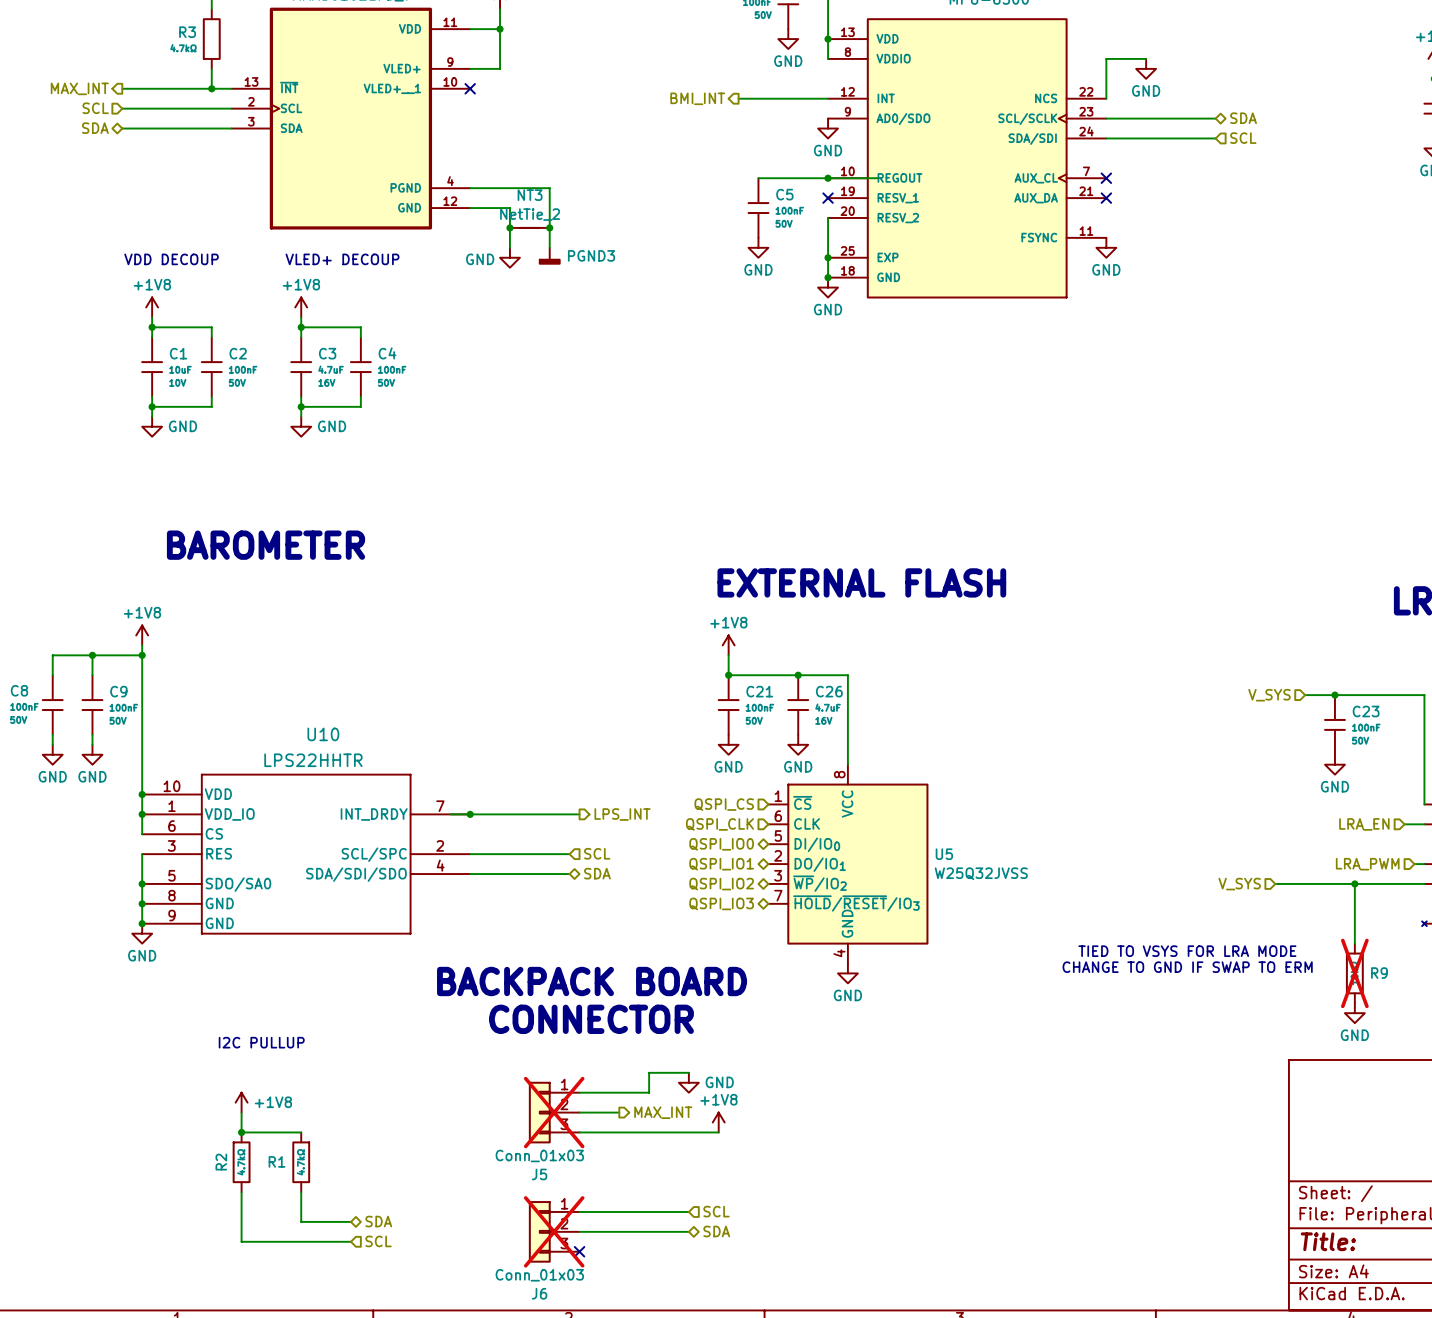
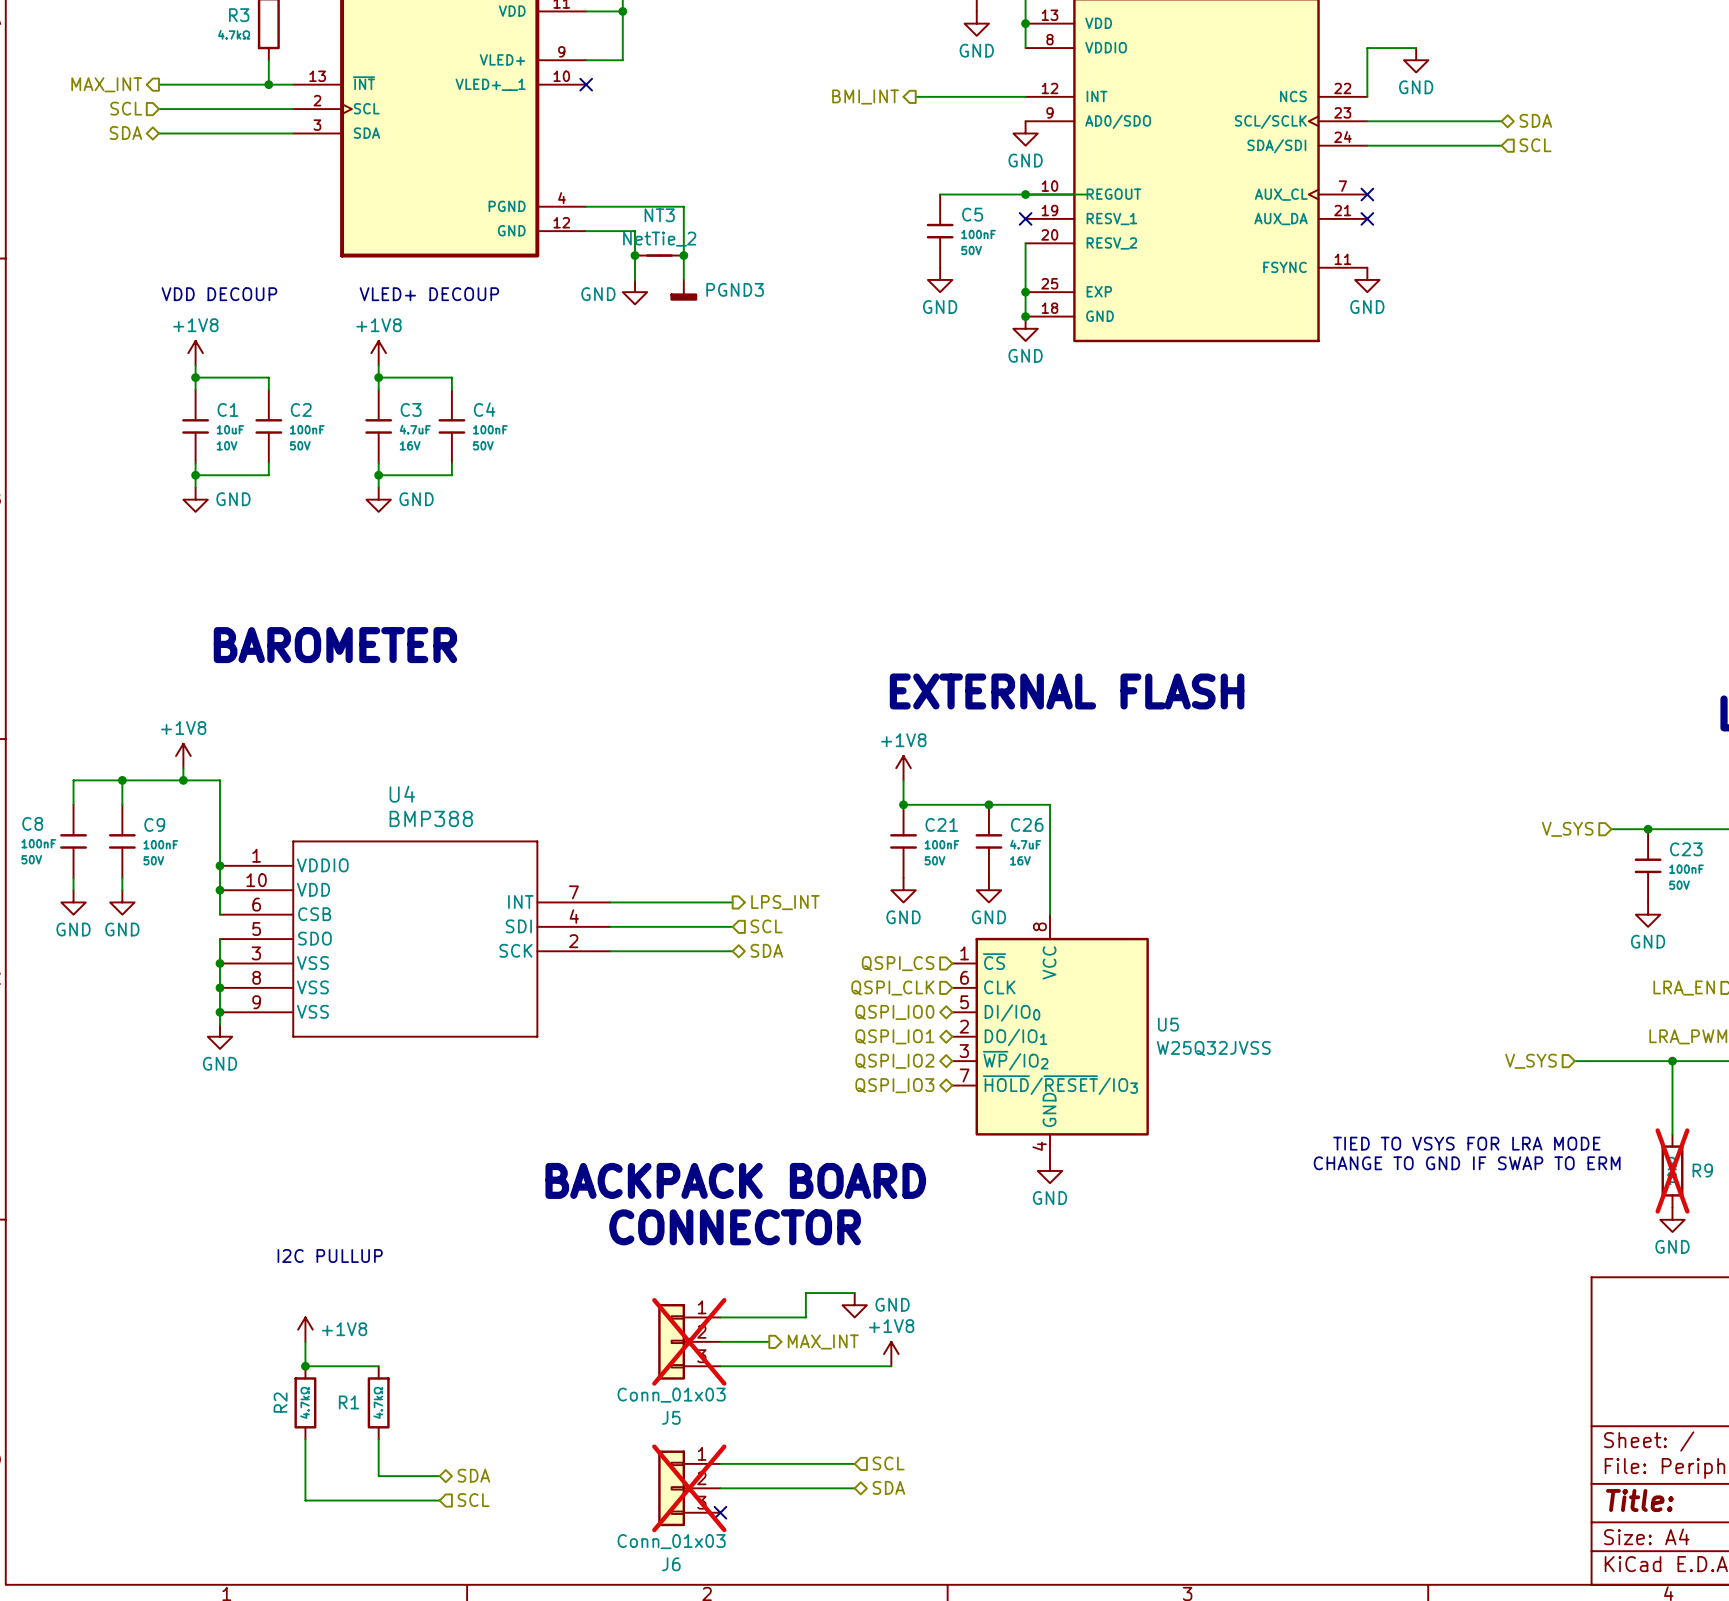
wire: (142, 655) (142, 834) -> (183, 780) (220, 780) (220, 914)
junction: none -> (220, 865)
junction: none -> (220, 890)
wire: none -> (610, 902) (732, 902)
U4: none -> BMP388 (415, 939)
junction: (142, 794) -> none
junction: none -> (220, 963)
junction: (142, 814) -> none
wire: (450, 814) (579, 814) -> none
junction: (470, 814) -> none
hierarchical label position: LPS_INT (622, 814) -> LPS_INT (785, 902)
junction: none -> (220, 987)
junction: none -> (220, 1012)
hierarchical label position: SCL (597, 853) -> SCL (766, 926)
wire: (142, 854) (142, 923) -> (220, 939) (220, 1024)
U10: LPS22HHTR (306, 854) -> none
wire: (470, 854) (569, 854) -> (610, 926) (732, 926)
hierarchical label position: SDA (597, 873) -> SDA (766, 950)
wire: (470, 874) (569, 874) -> (610, 951) (732, 951)
junction: (142, 883) -> none
junction: (142, 903) -> none
junction: (142, 923) -> none
power symbol position: GND (142, 933) -> GND (220, 1036)

